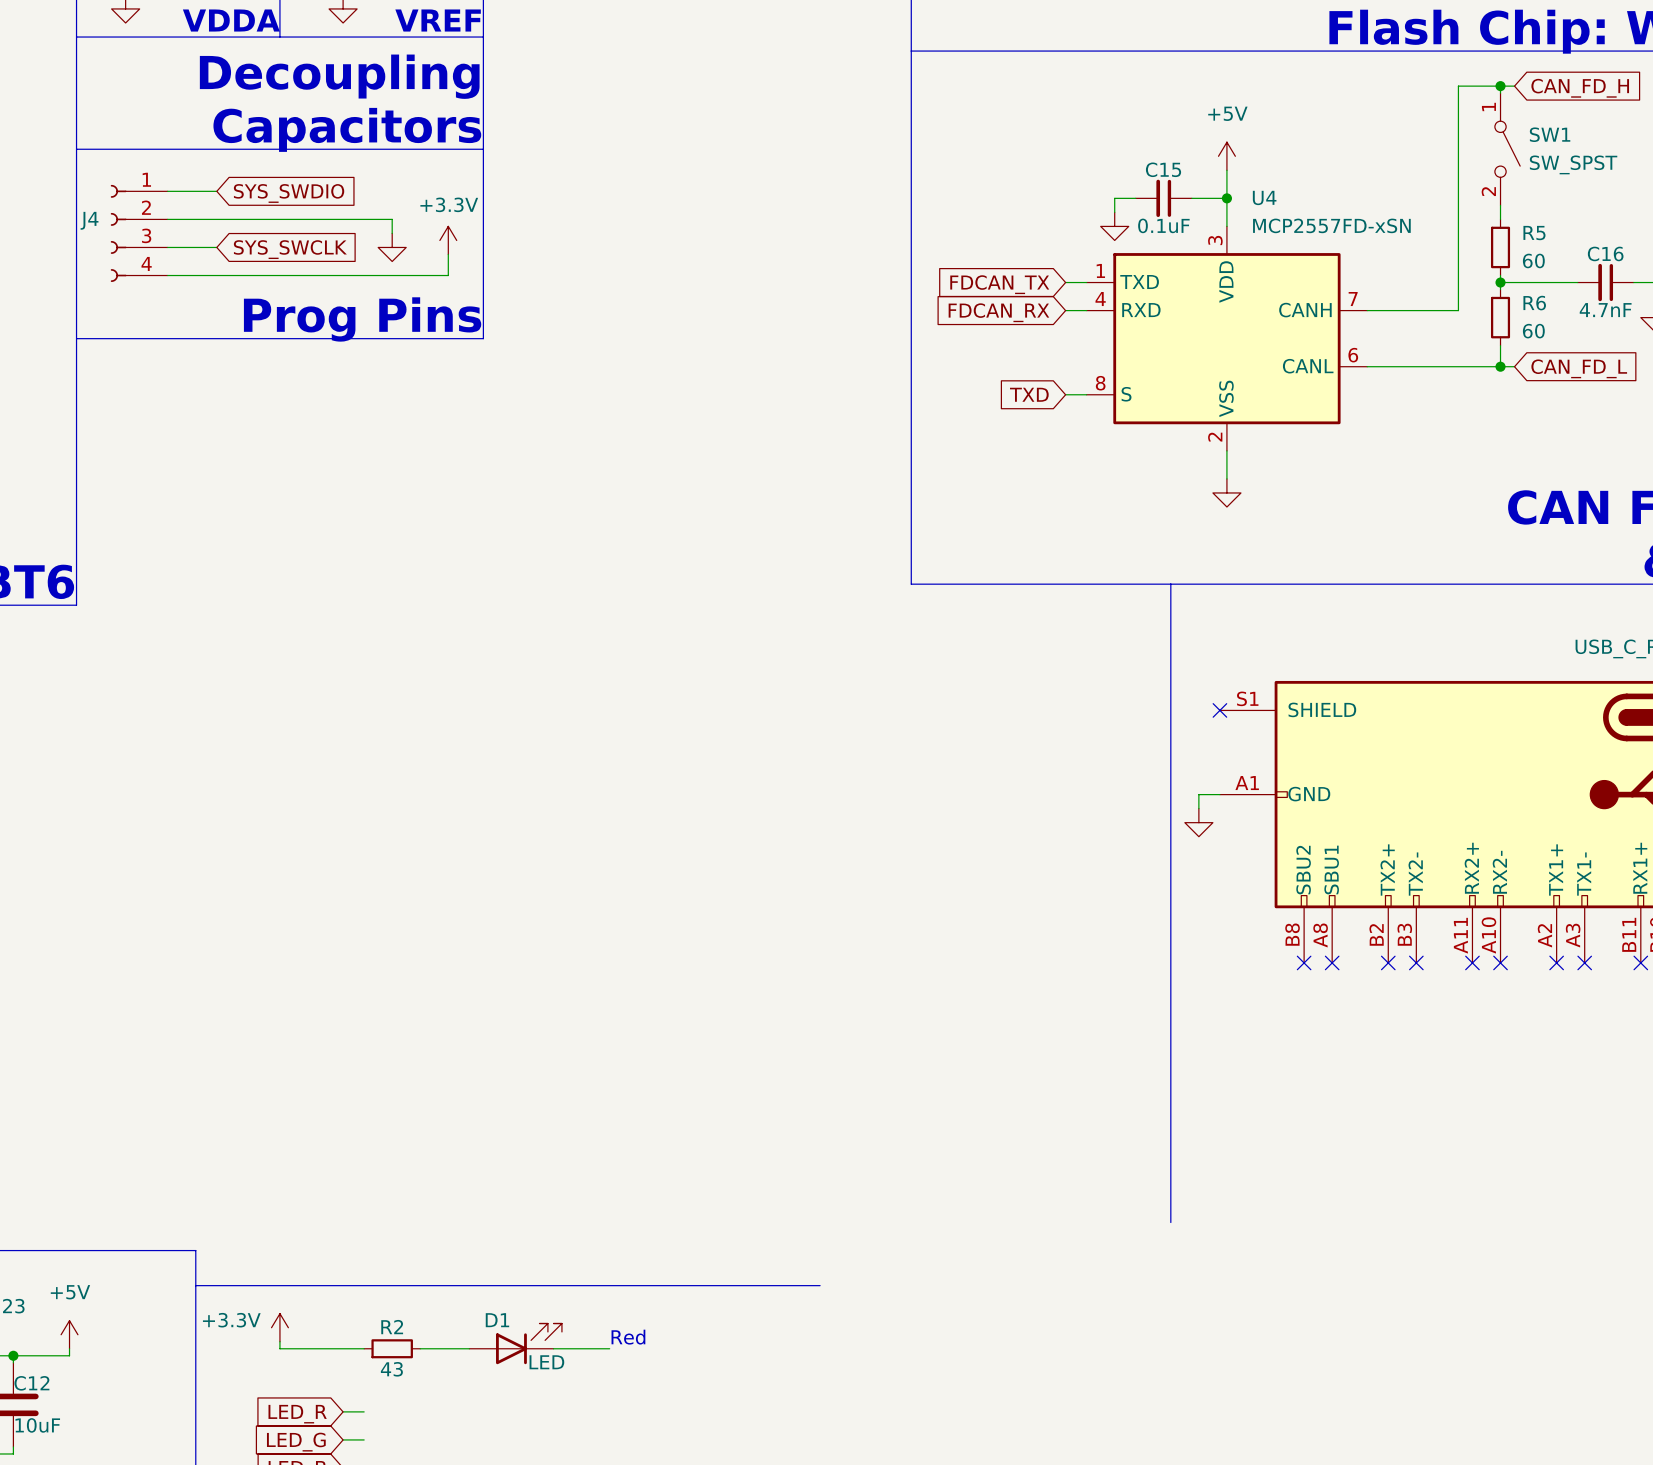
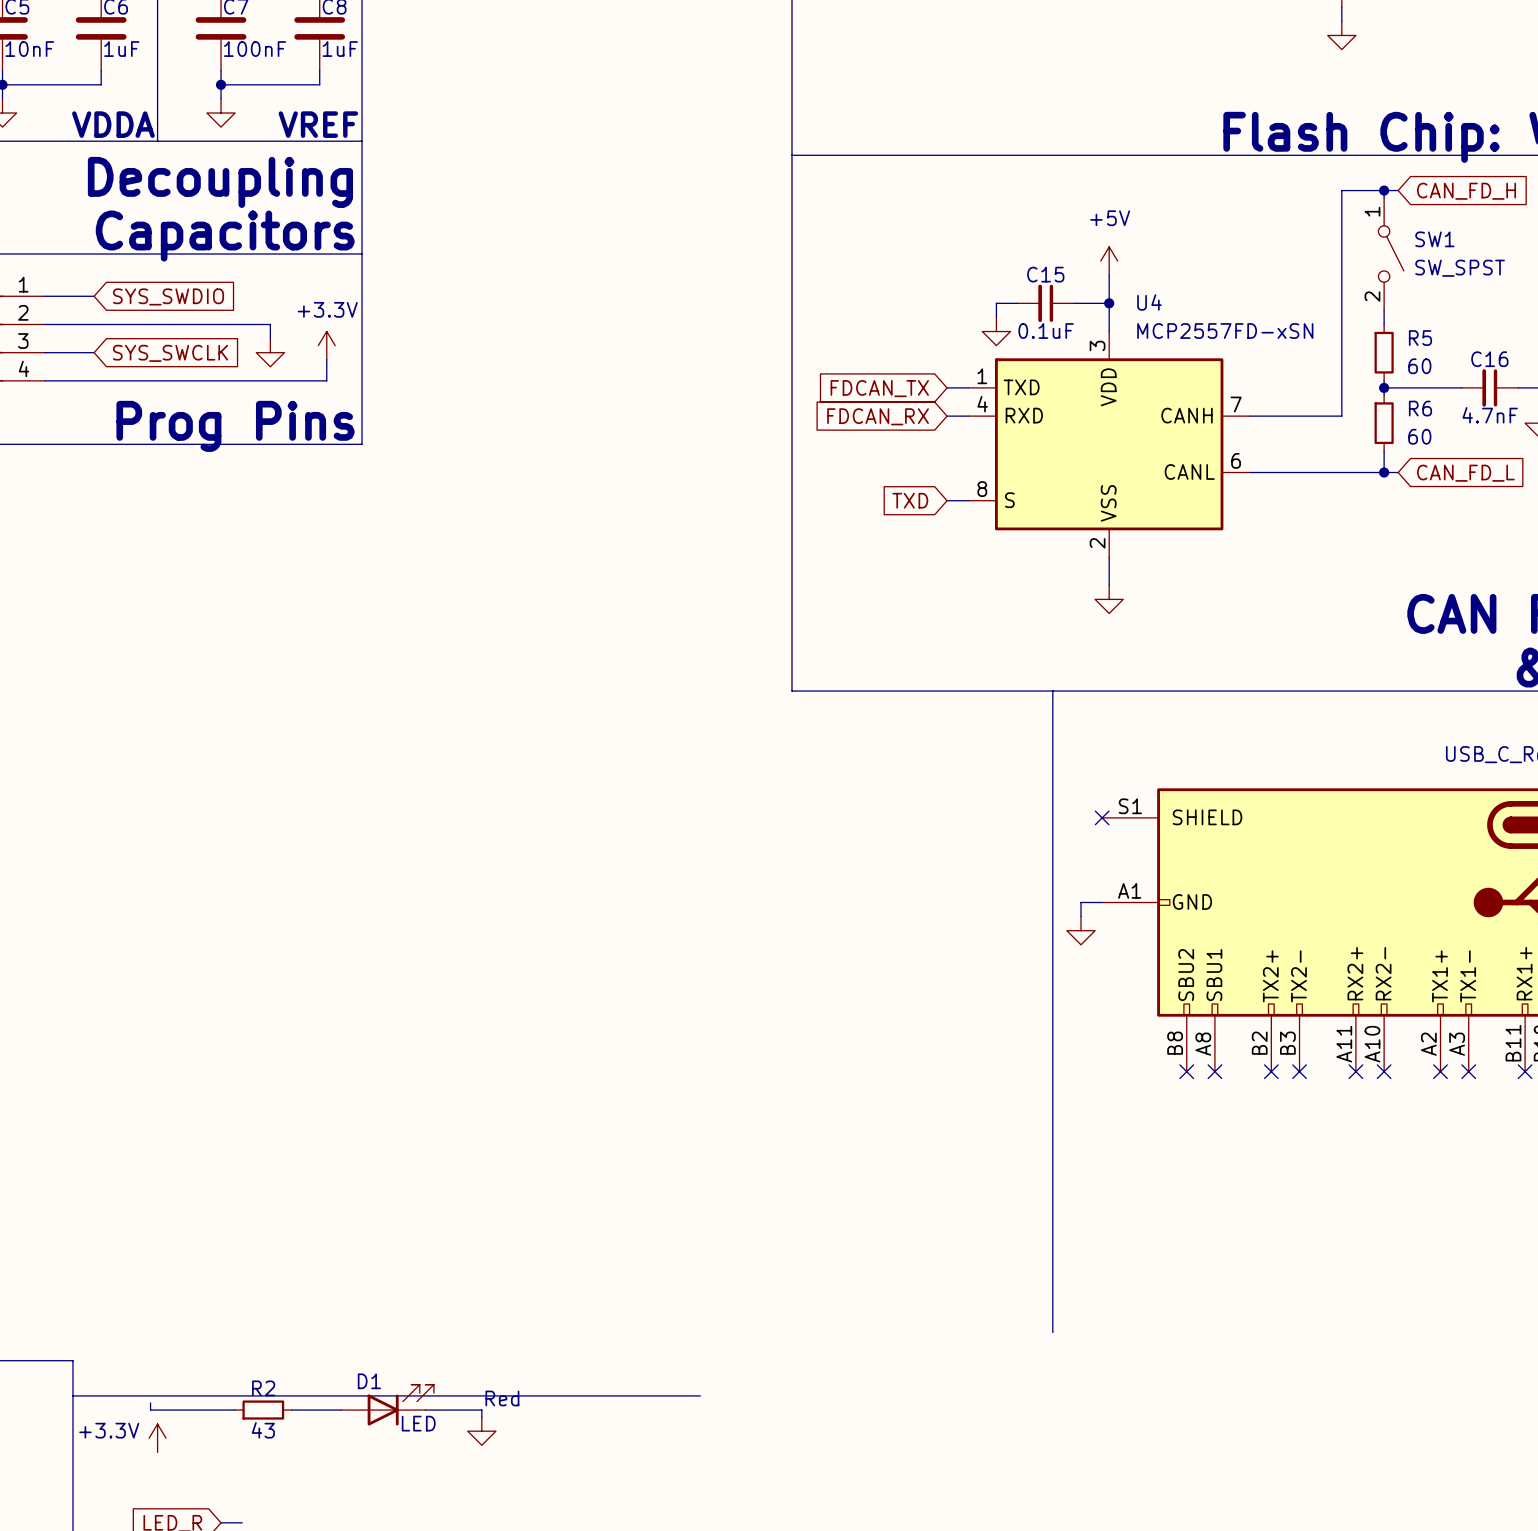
wire: none -> (425, 1410) (481, 1410) (481, 1417)
power symbol: none -> (481, 1431)
text position: Red (628, 1337) -> Red (502, 1398)
wire: (279, 1341) (279, 1348) (364, 1348) -> (150, 1402) (150, 1410) (235, 1410)
D1 position: (515, 1343) -> (387, 1405)
R2 position: (392, 1348) -> (263, 1410)
wire: (420, 1348) (469, 1348) -> (291, 1410) (340, 1410)
wire: (553, 1348) (609, 1348) -> none

